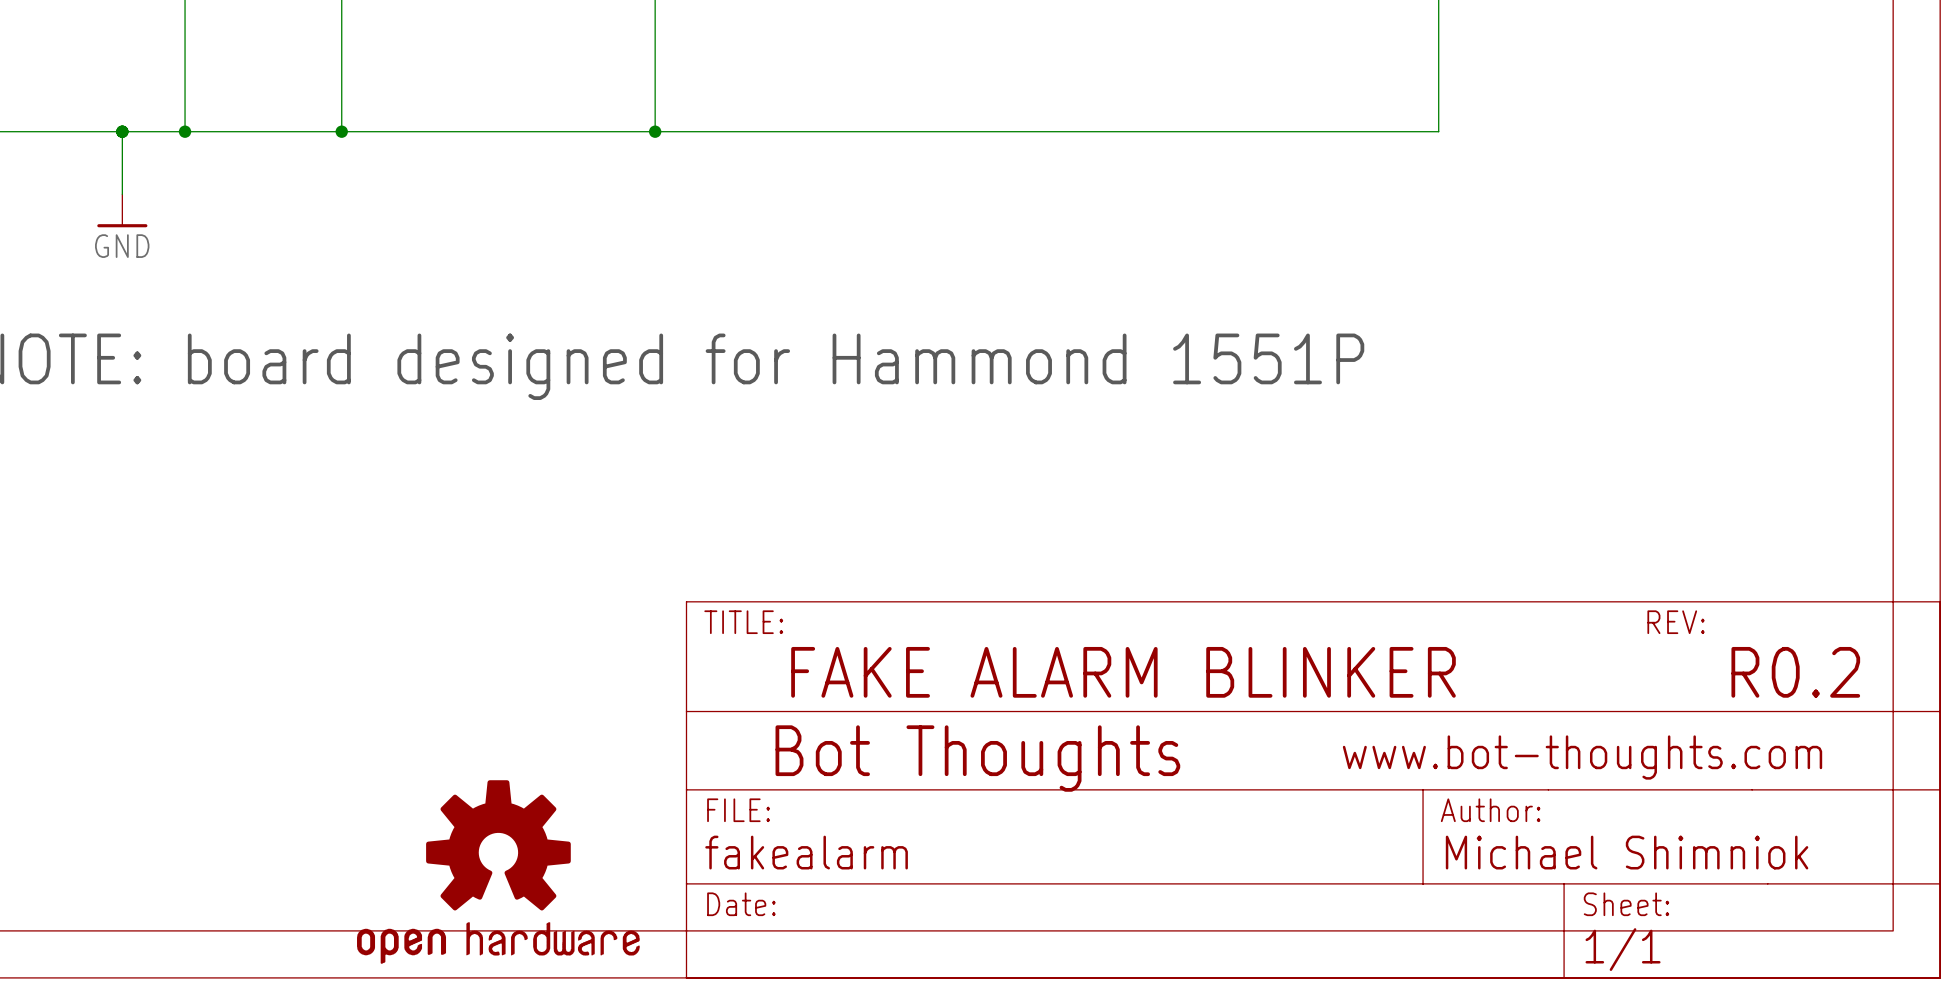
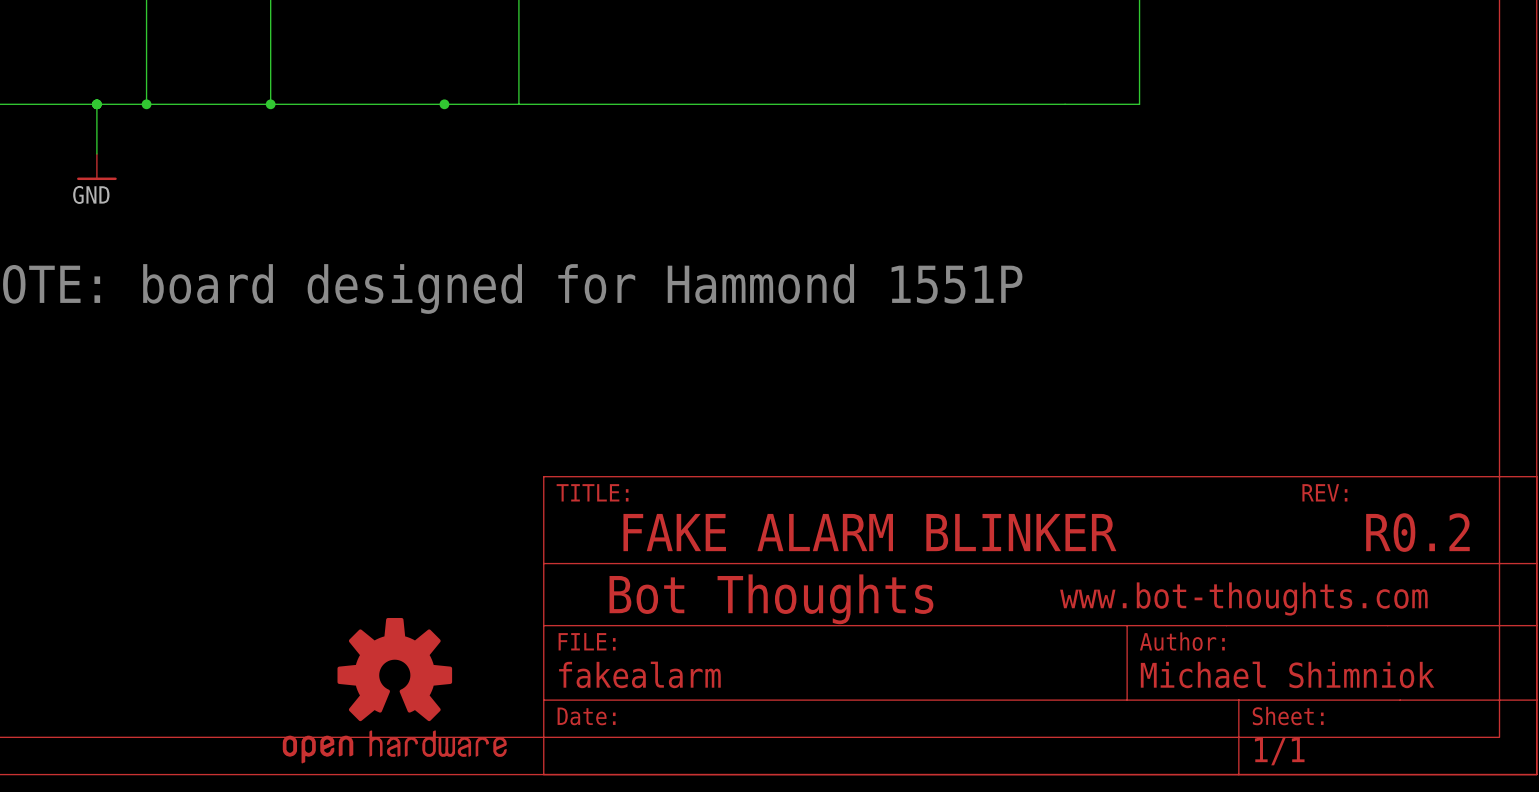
junction: none -> (444, 104)
junction: (655, 131) -> none

